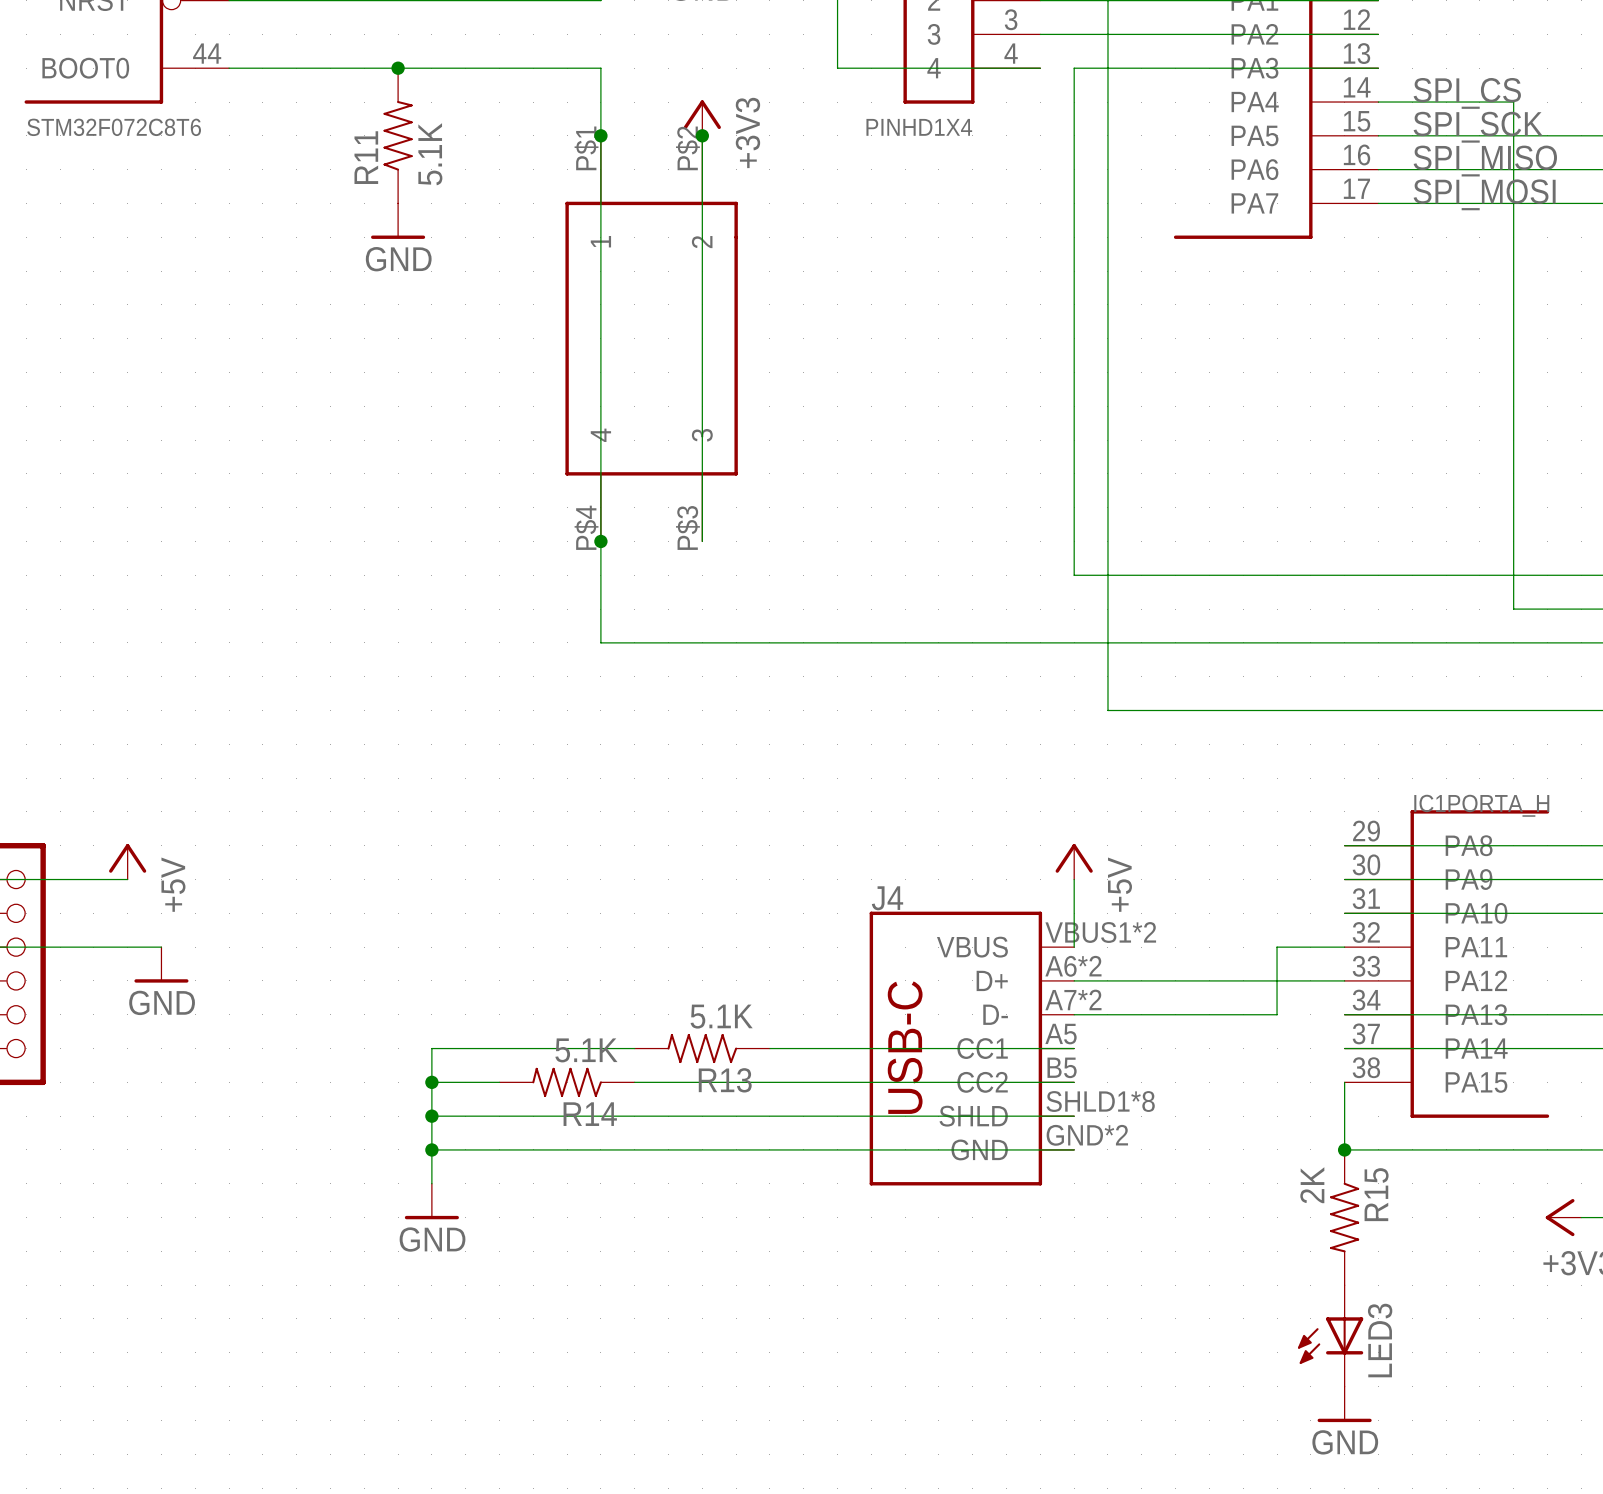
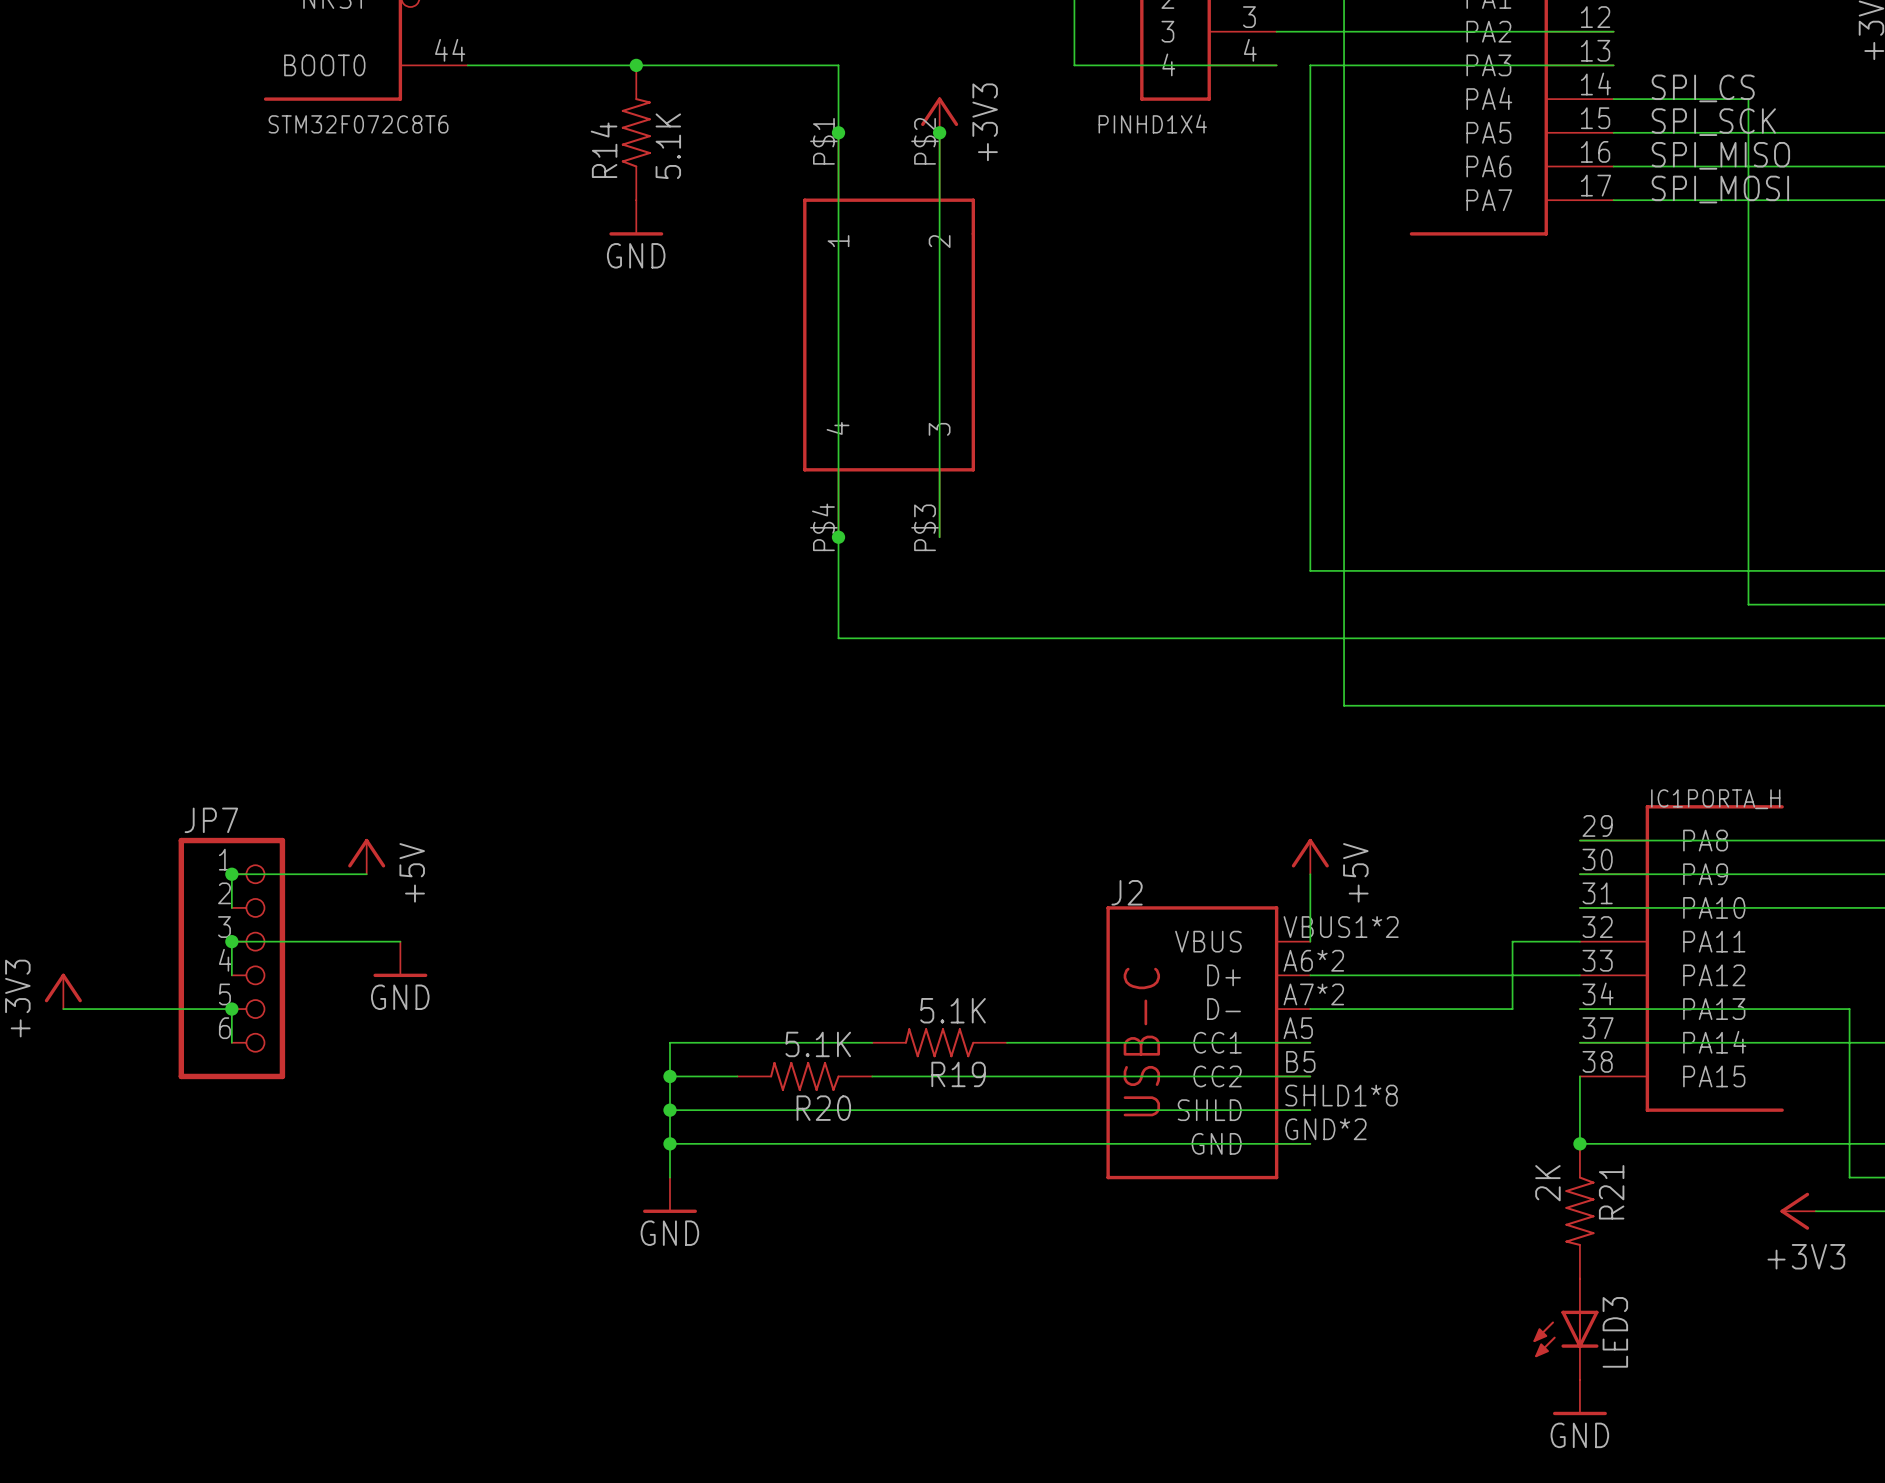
R11 name: R11 (366, 157) -> R14 (604, 150)
J4 name: J4 (887, 898) -> J2 (1127, 892)
R13 name: R13 (725, 1080) -> R19 (958, 1074)
R14 name: R14 (590, 1114) -> R20 (823, 1108)
R15 name: R15 (1376, 1194) -> R21 (1611, 1192)

